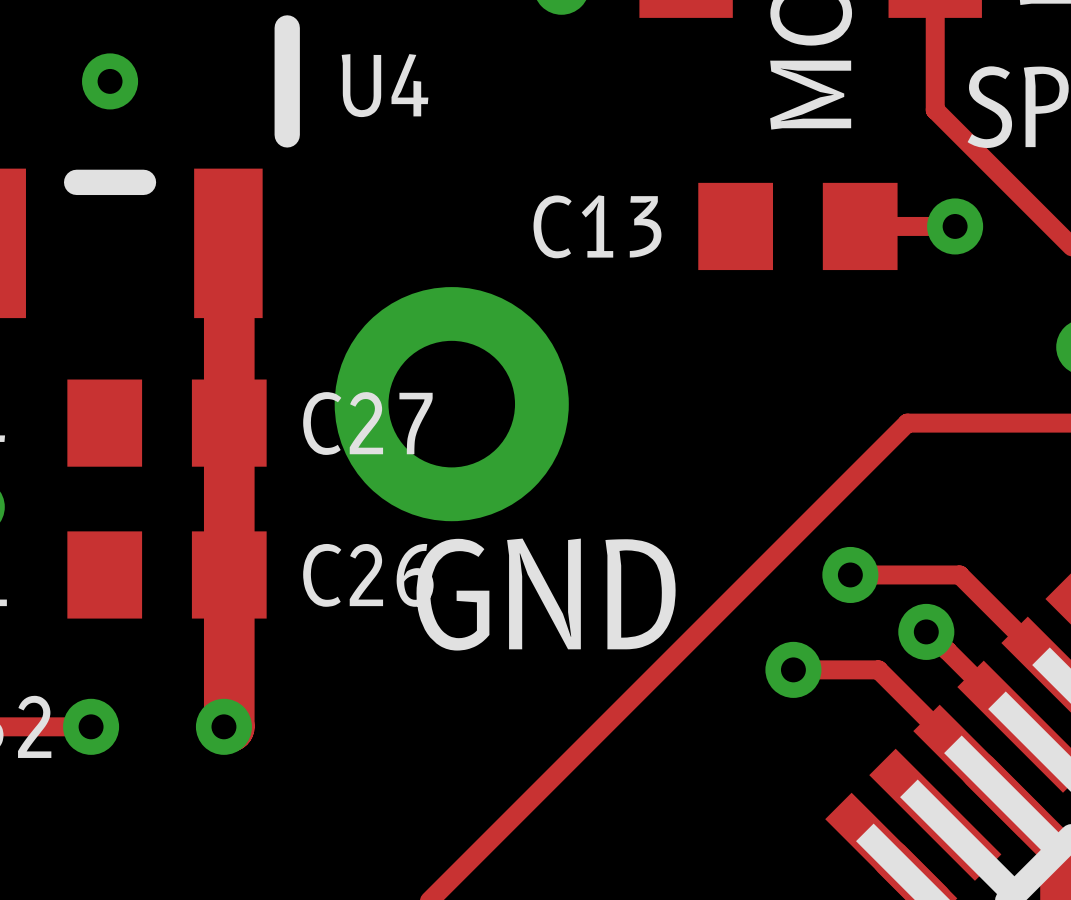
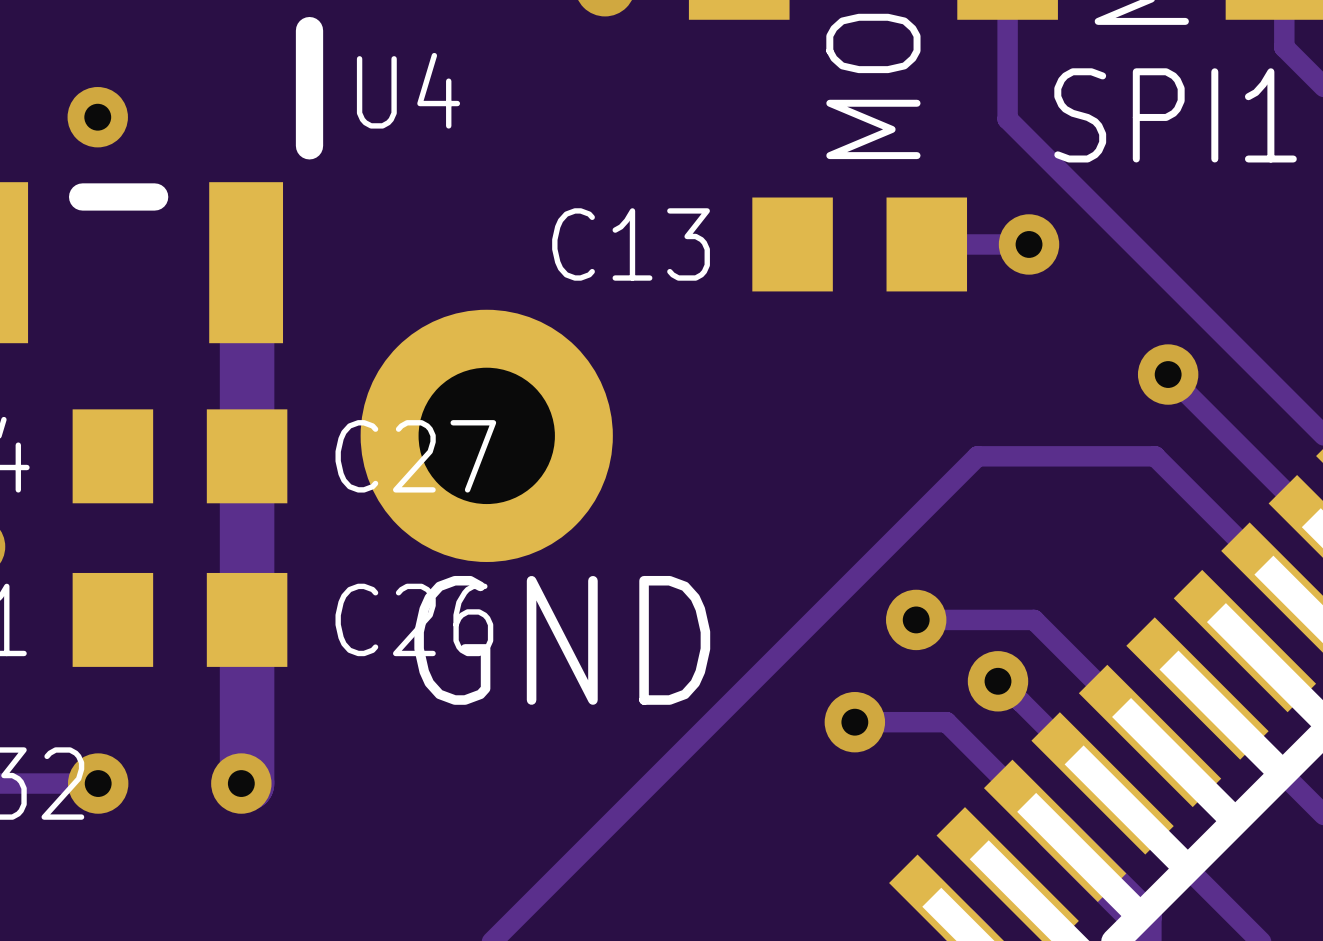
via position: (110, 81) -> (97, 117)

